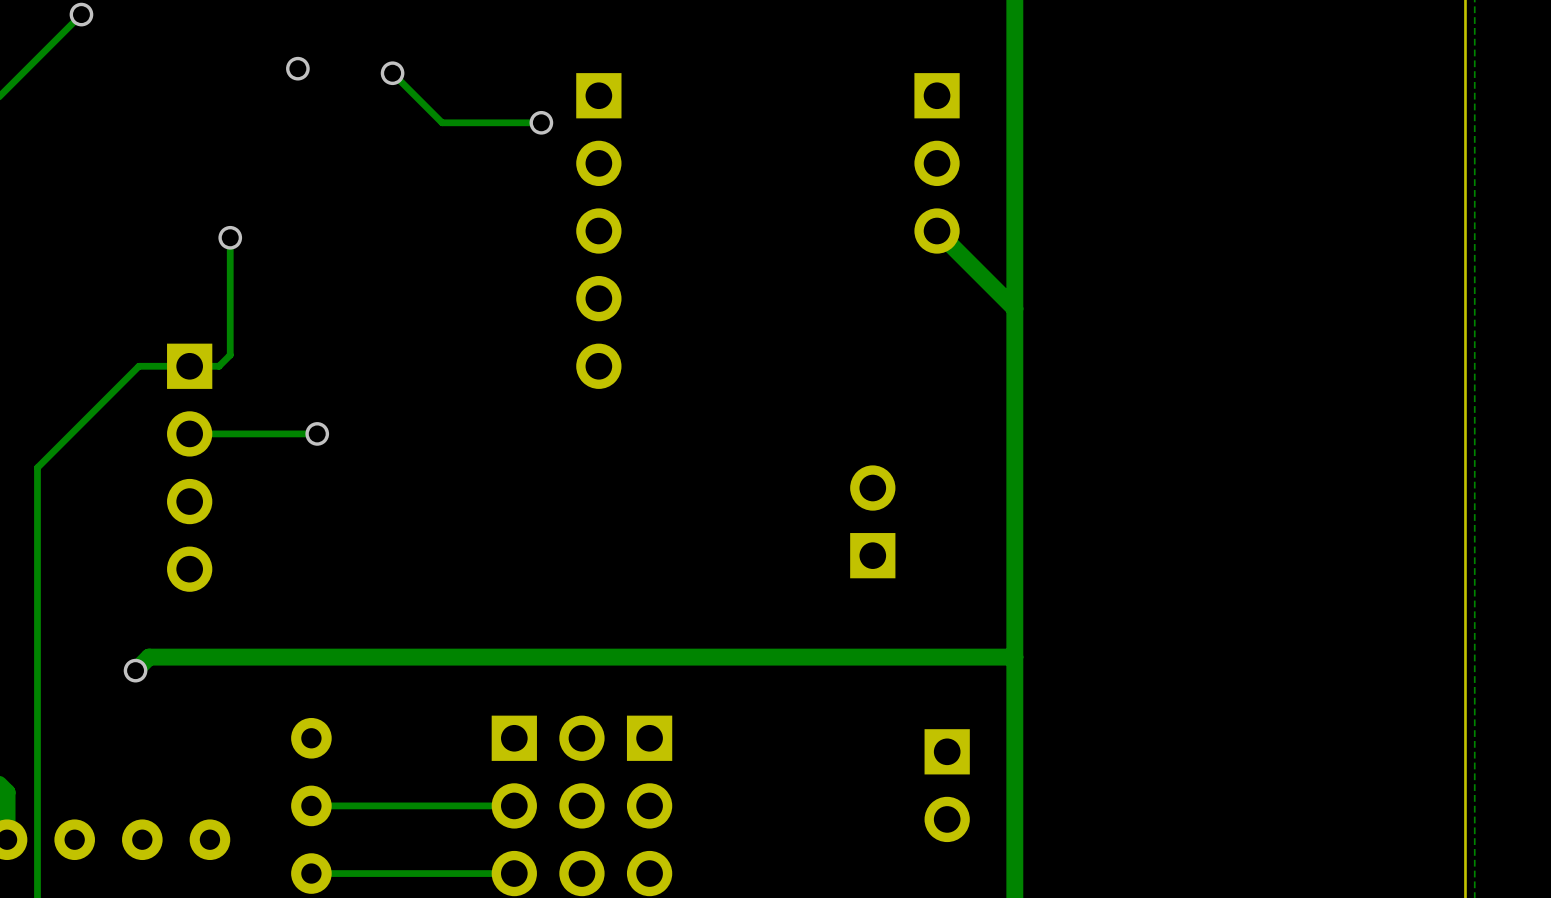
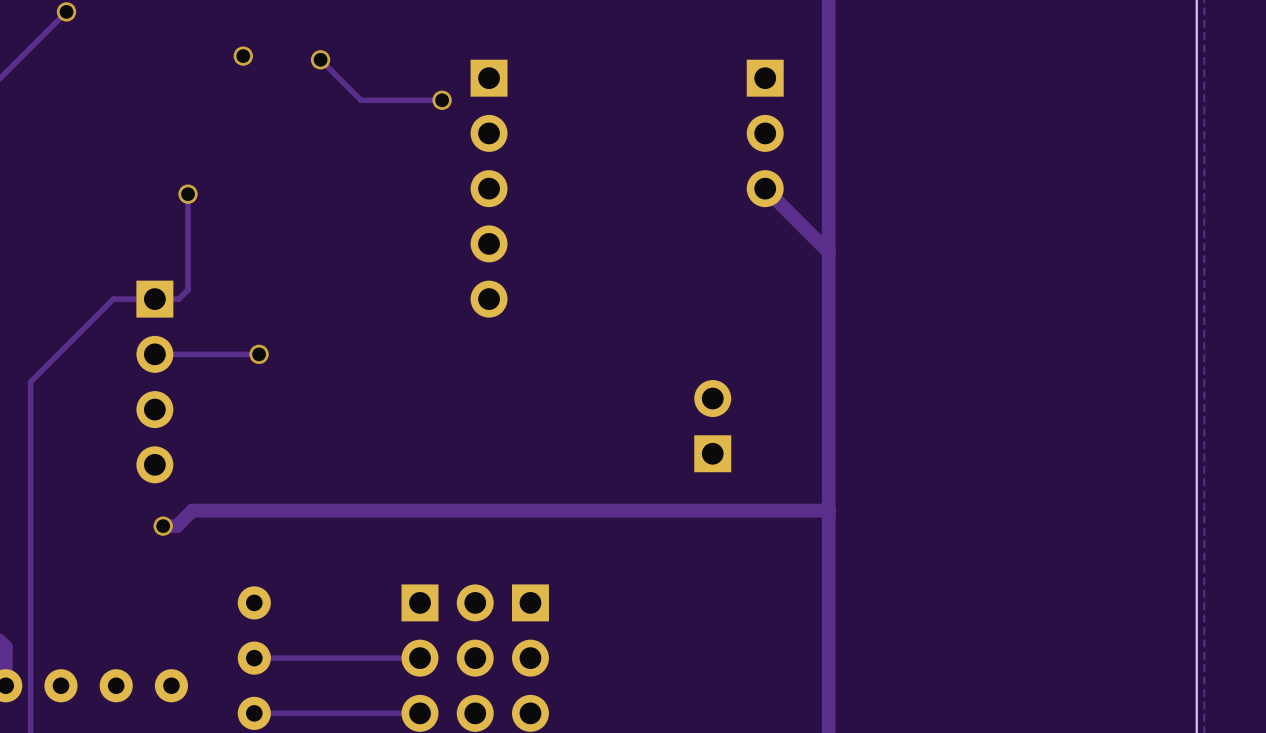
track: none -> (829, 510) (192, 510) (176, 526) (163, 526)
track: (1014, 657) (149, 657) (135, 670) -> none
via position: (135, 670) -> (163, 526)
part: (947, 785) -> none

